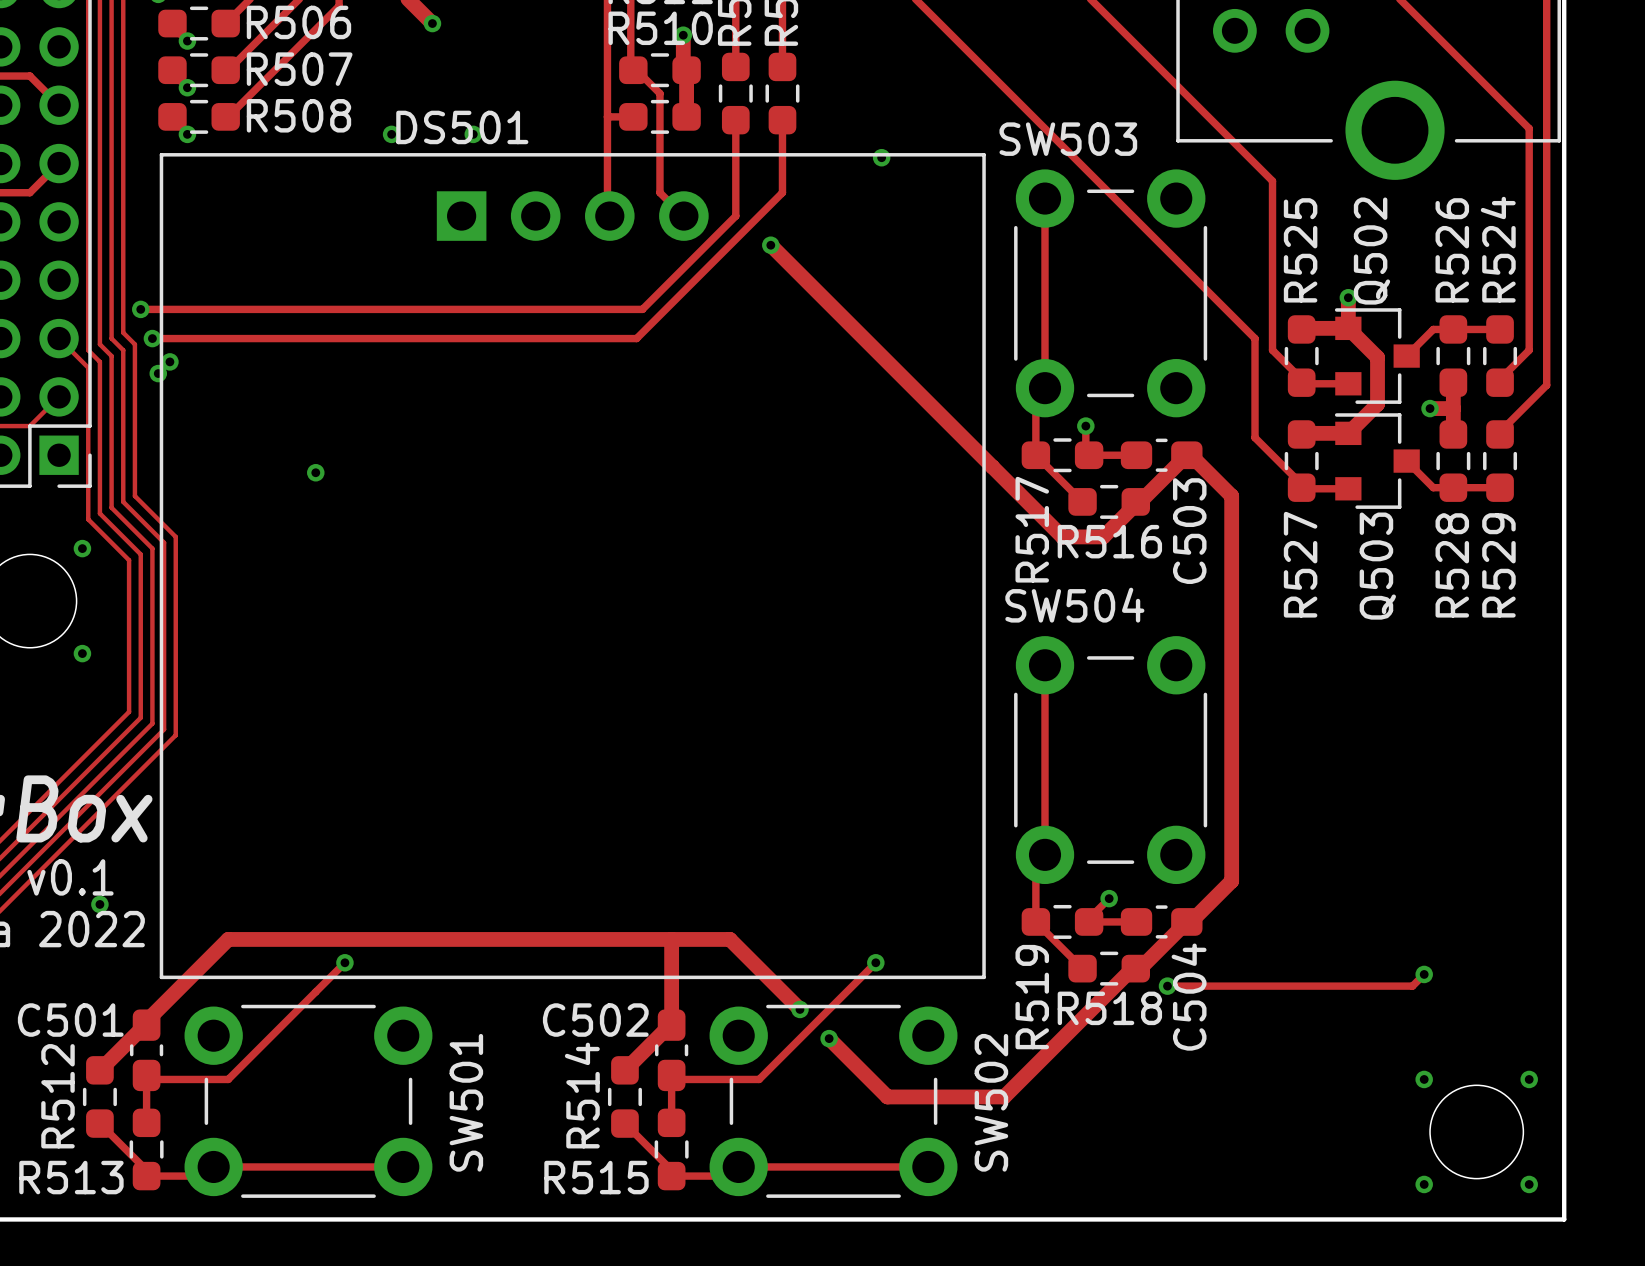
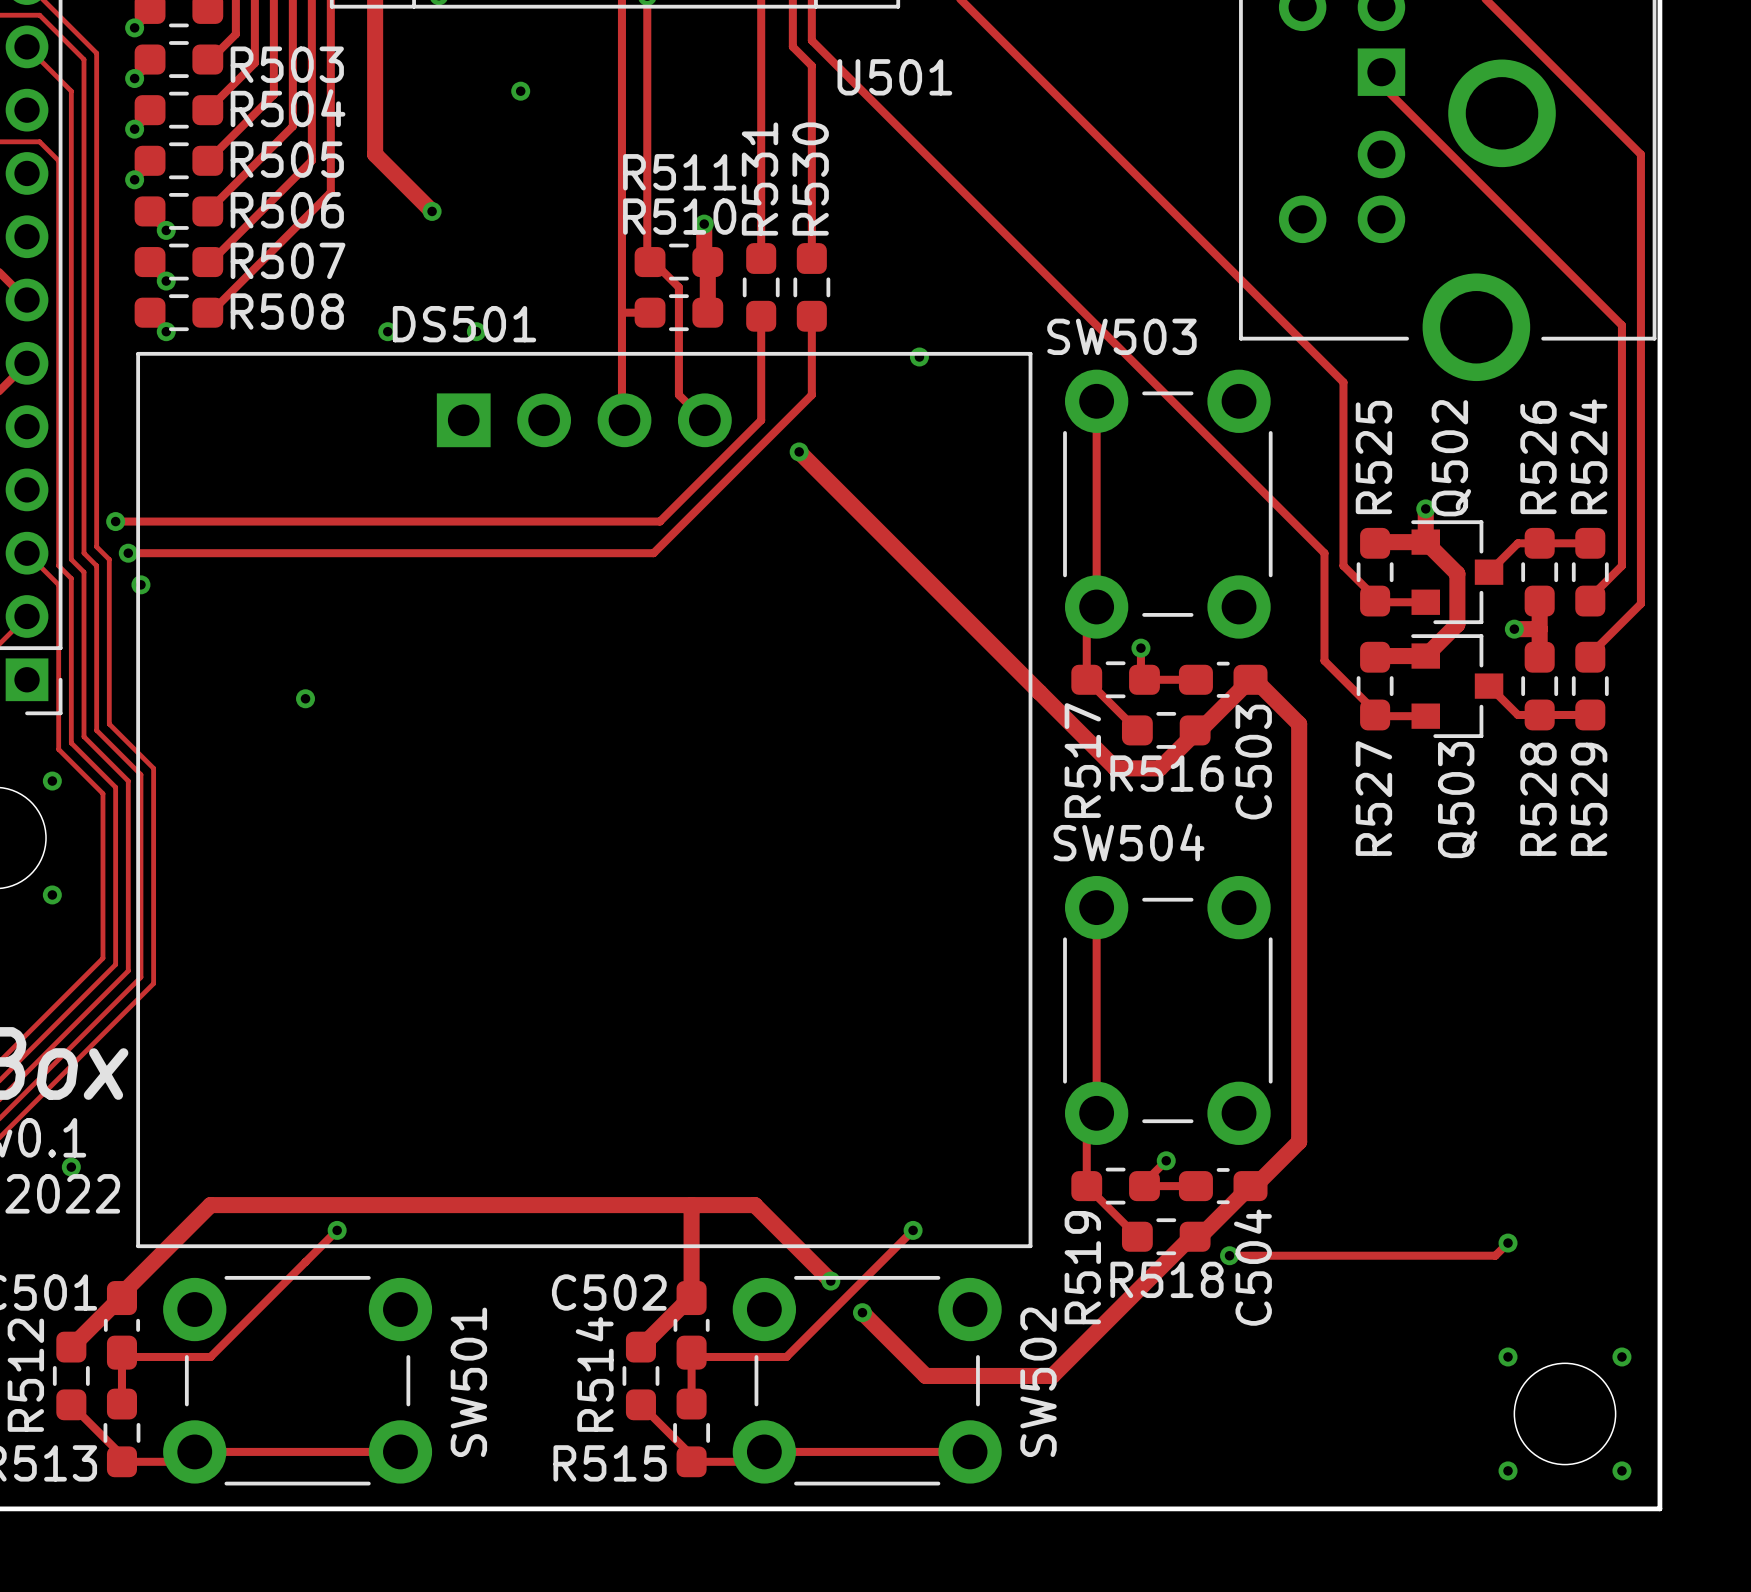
via: (169, 361) -> none
via: none -> (140, 584)
via: (158, 373) -> none

